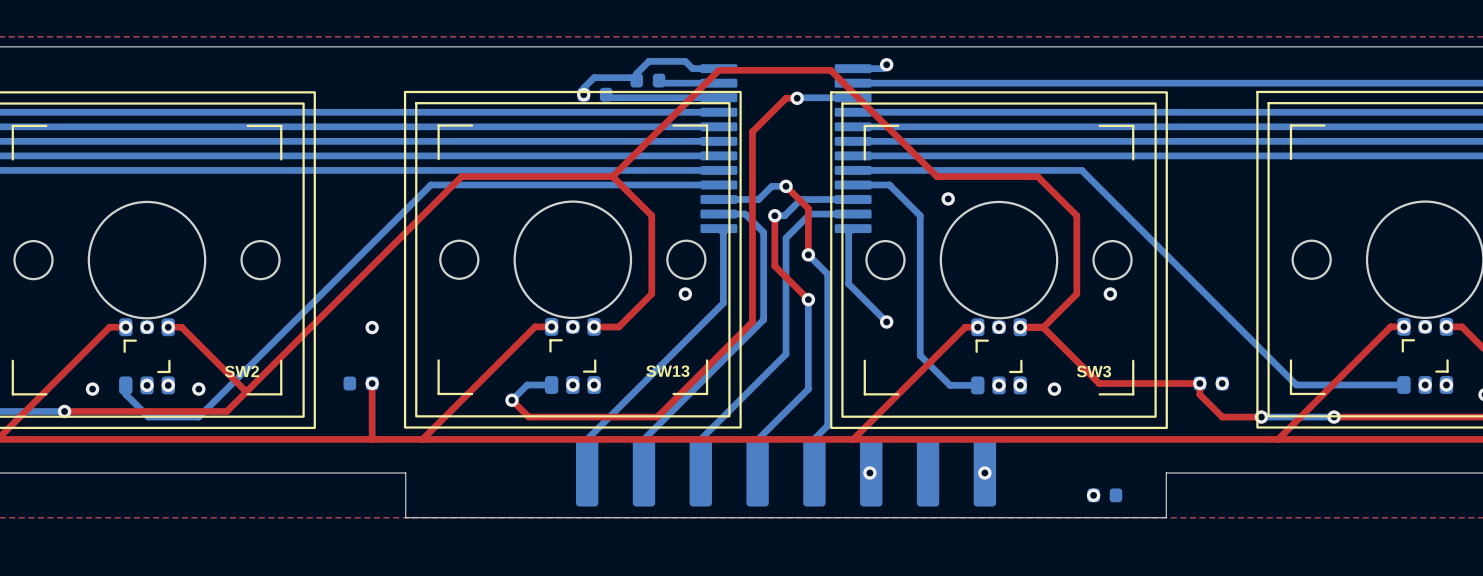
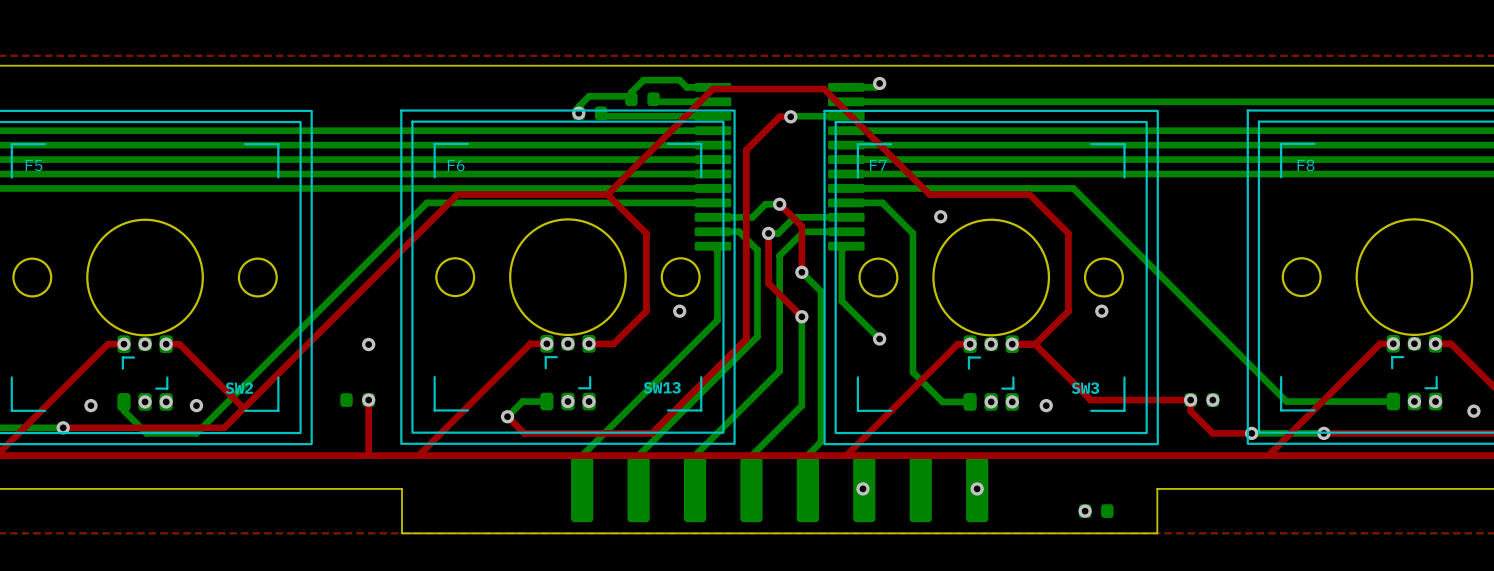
text: none -> F5 (34, 165)
text: none -> F6 (456, 165)
text: none -> F7 (878, 165)
text: none -> F8 (1306, 165)

